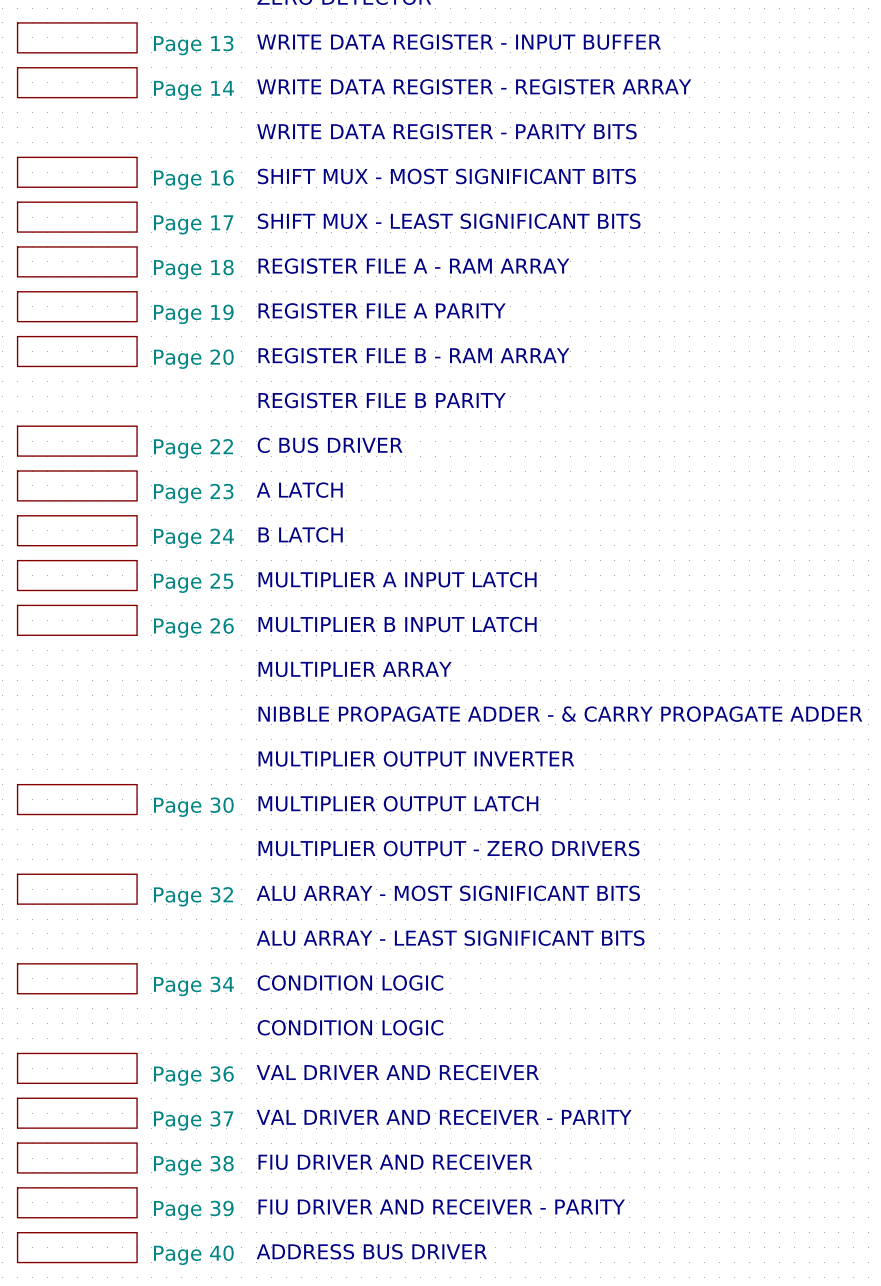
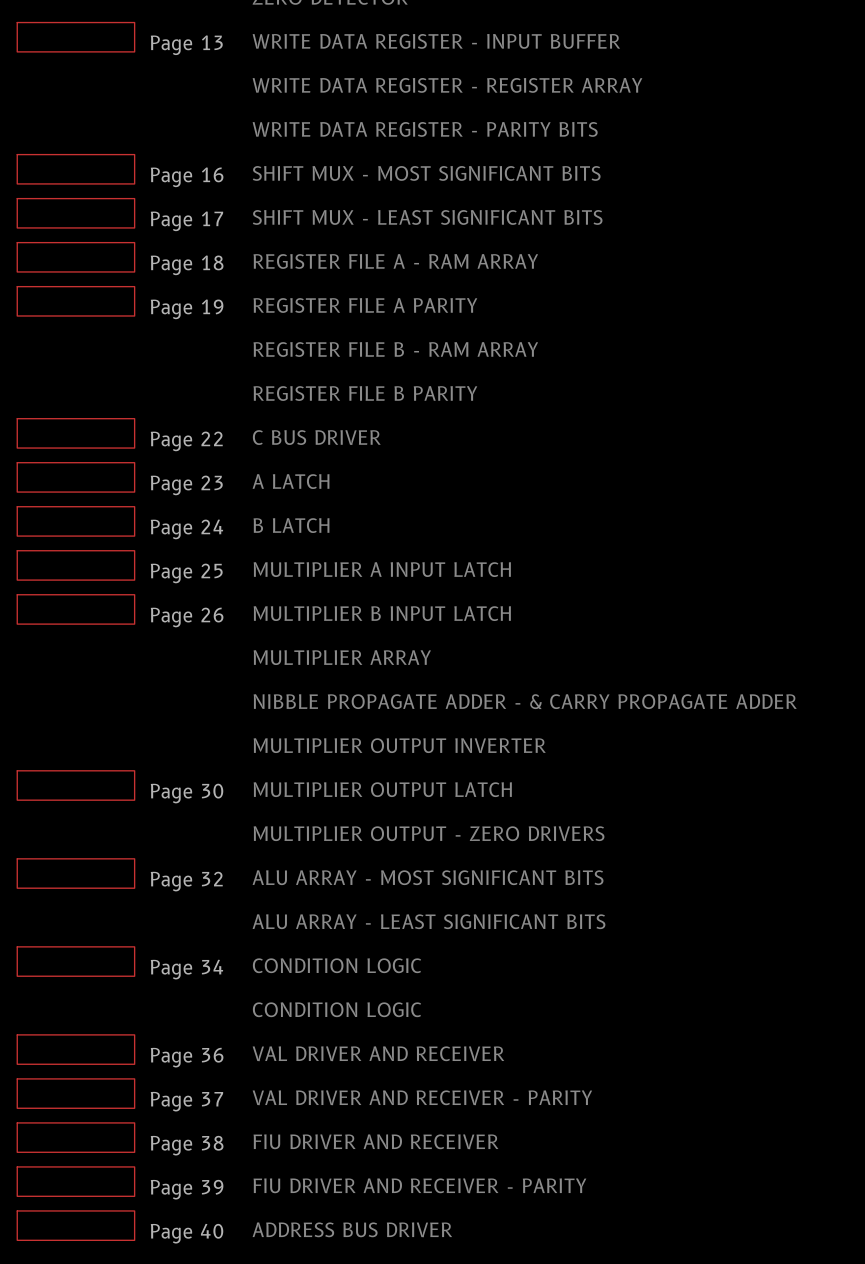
sheet Page 14: (77, 82) -> none
sheet Page 20: (77, 351) -> none

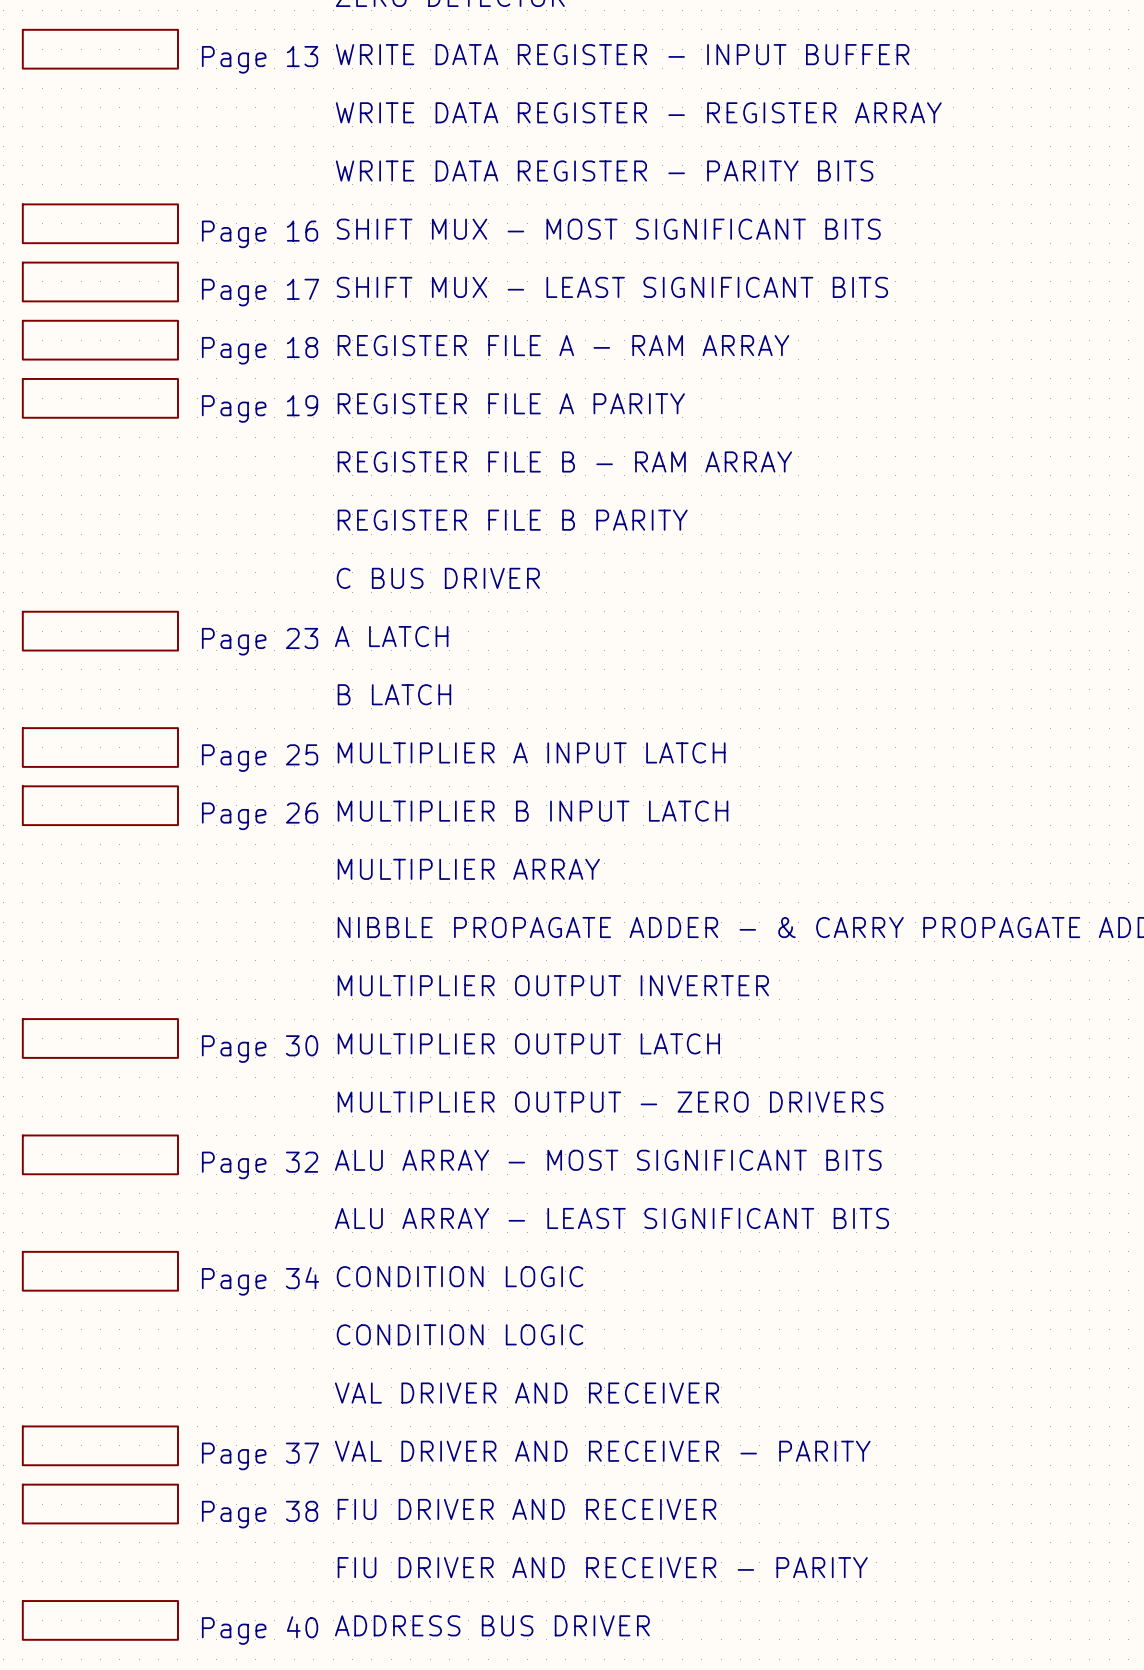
sheet Page 22: (75, 433) -> none
sheet Page 24: (75, 521) -> none
sheet Page 36: (75, 1049) -> none
sheet Page 39: (75, 1181) -> none

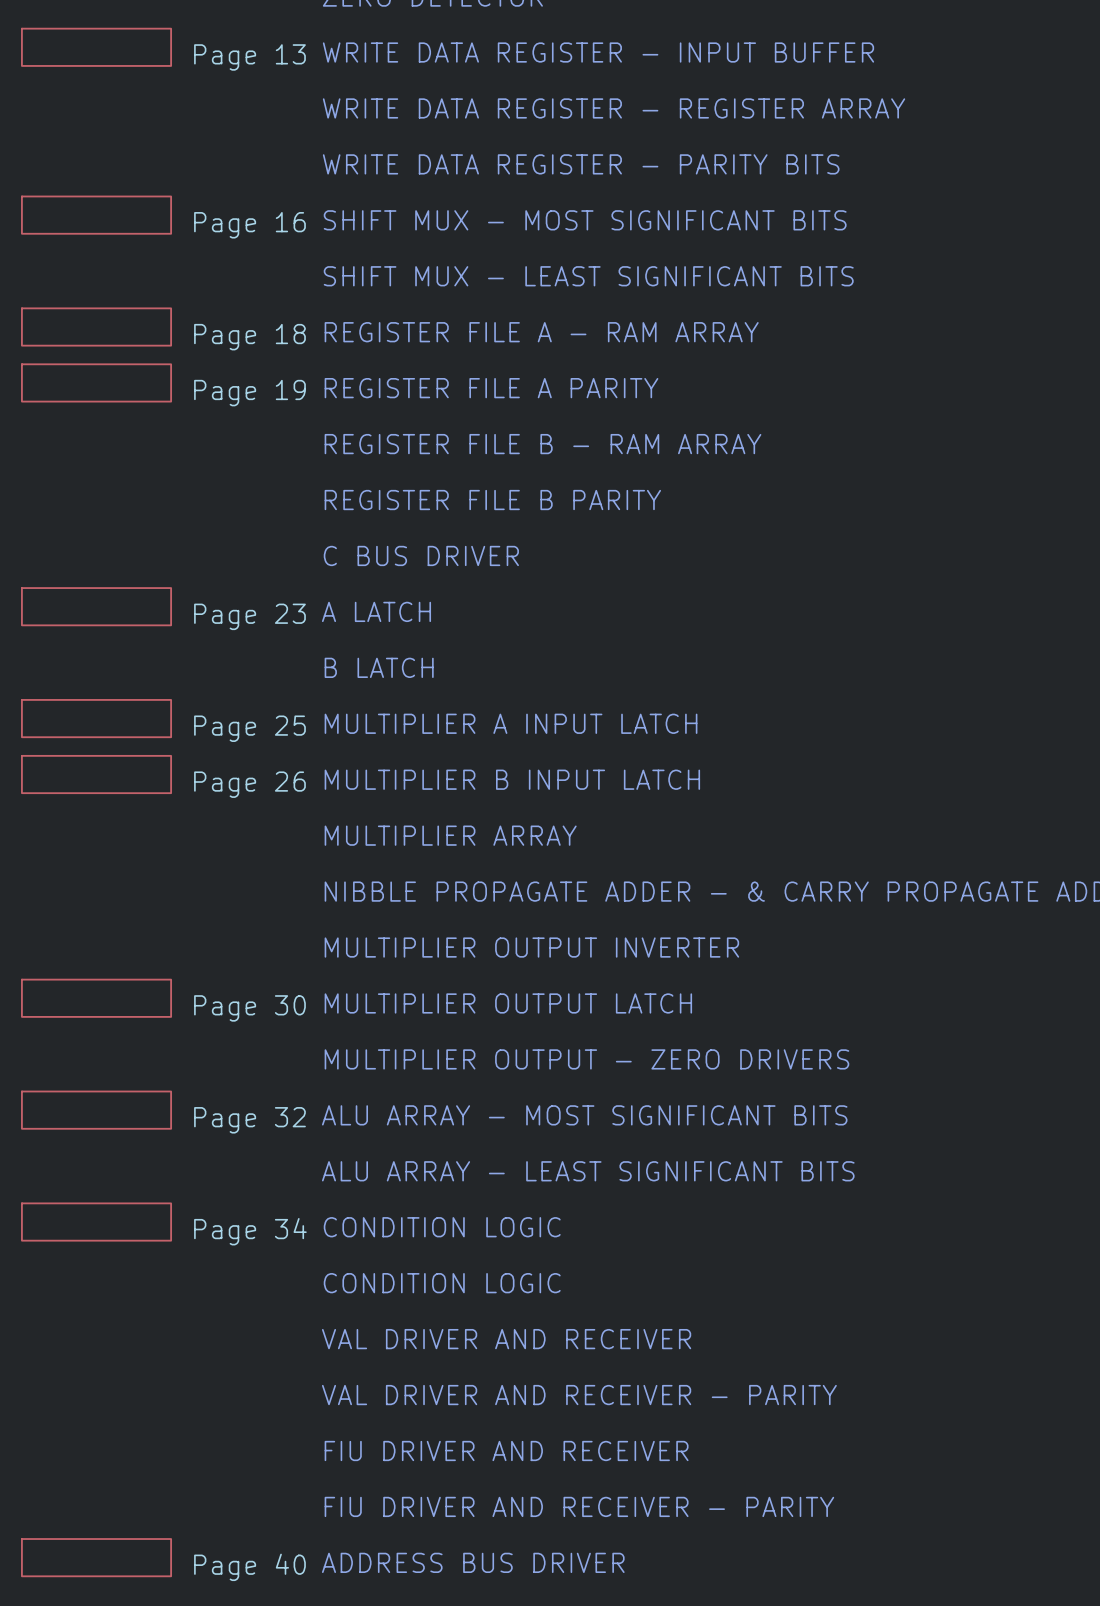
sheet Page 17: (100, 281) -> none
sheet Page 37: (100, 1445) -> none
sheet Page 38: (100, 1504) -> none

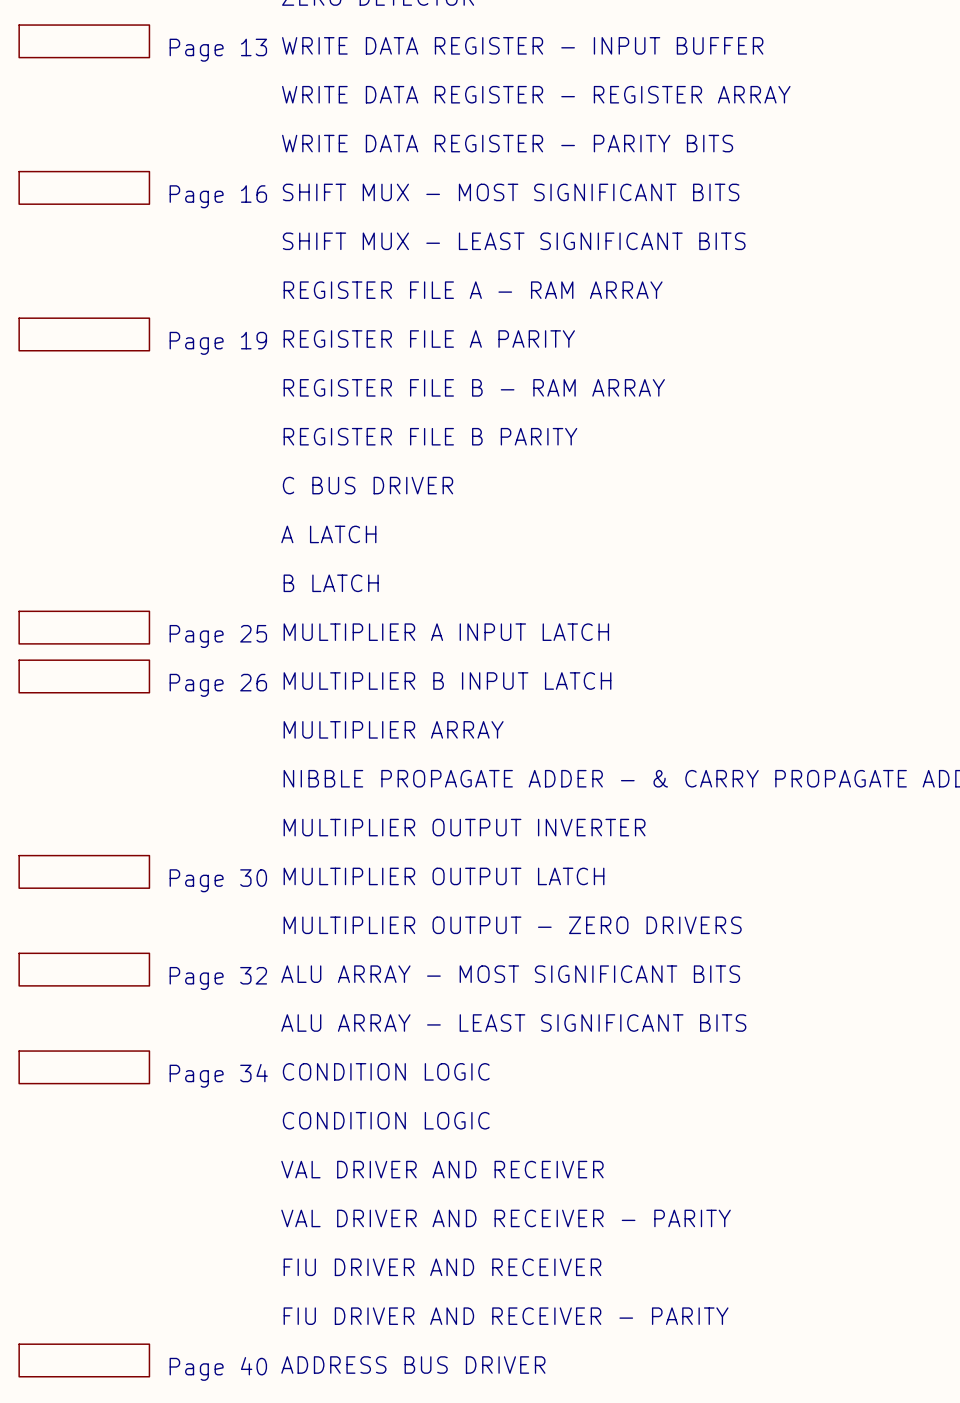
sheet Page 18: (96, 327) -> none
sheet Page 23: (96, 606) -> none

